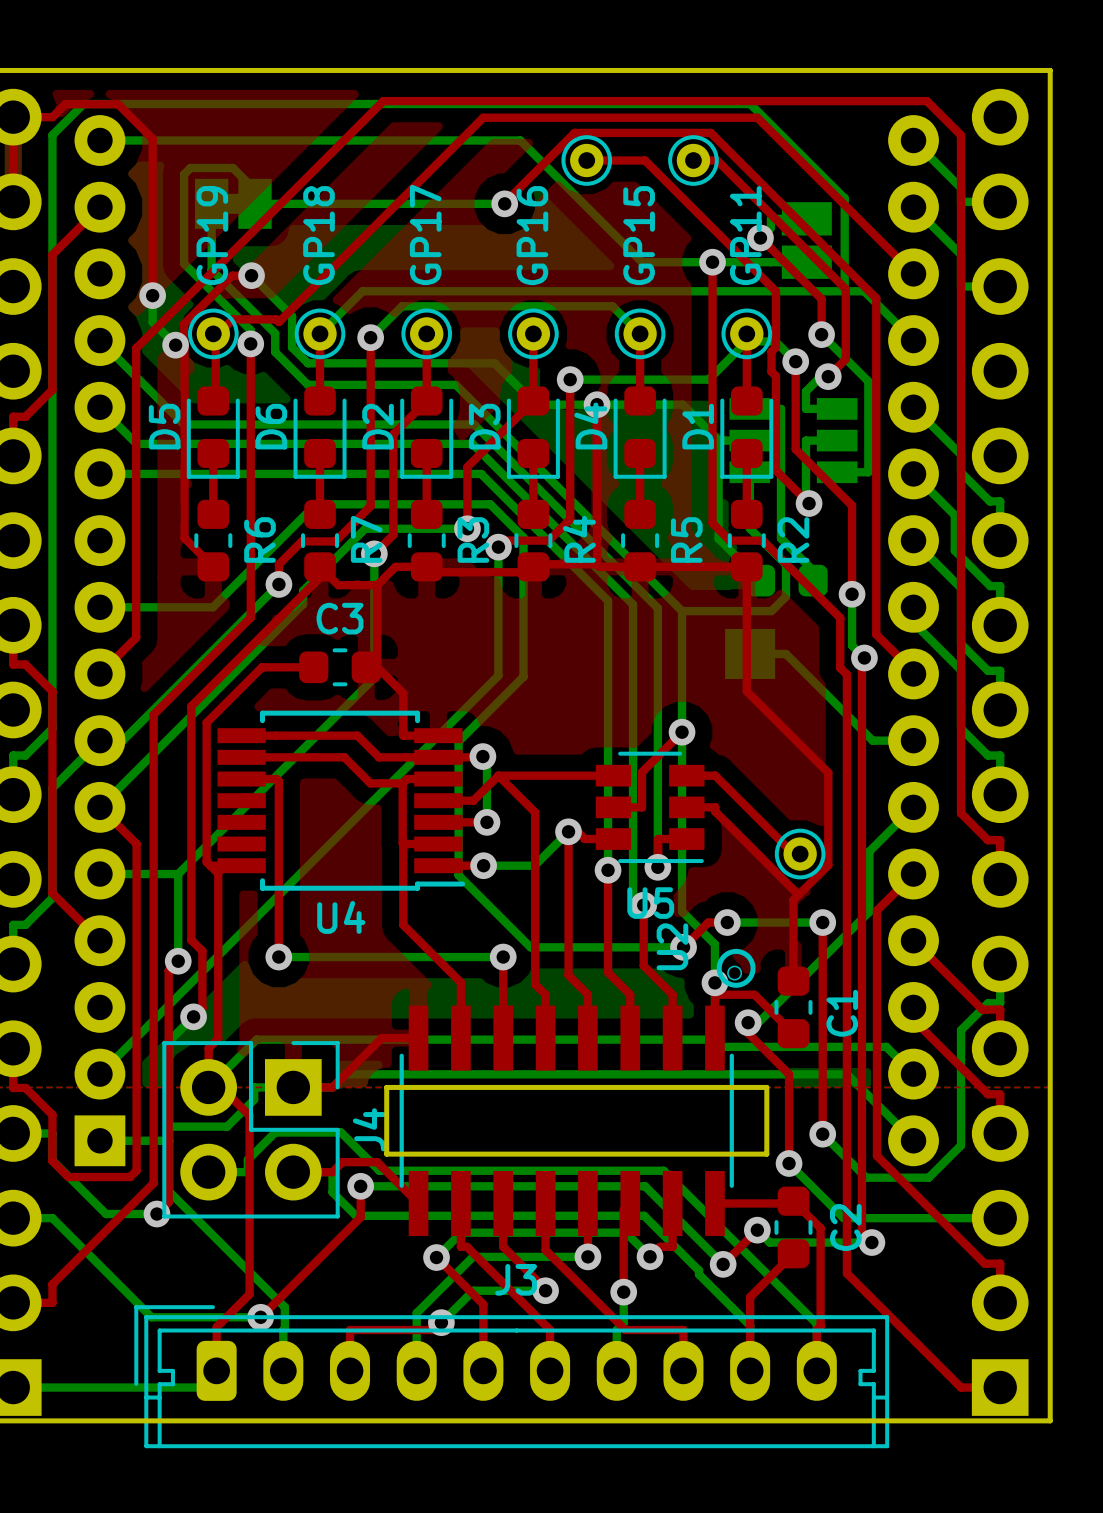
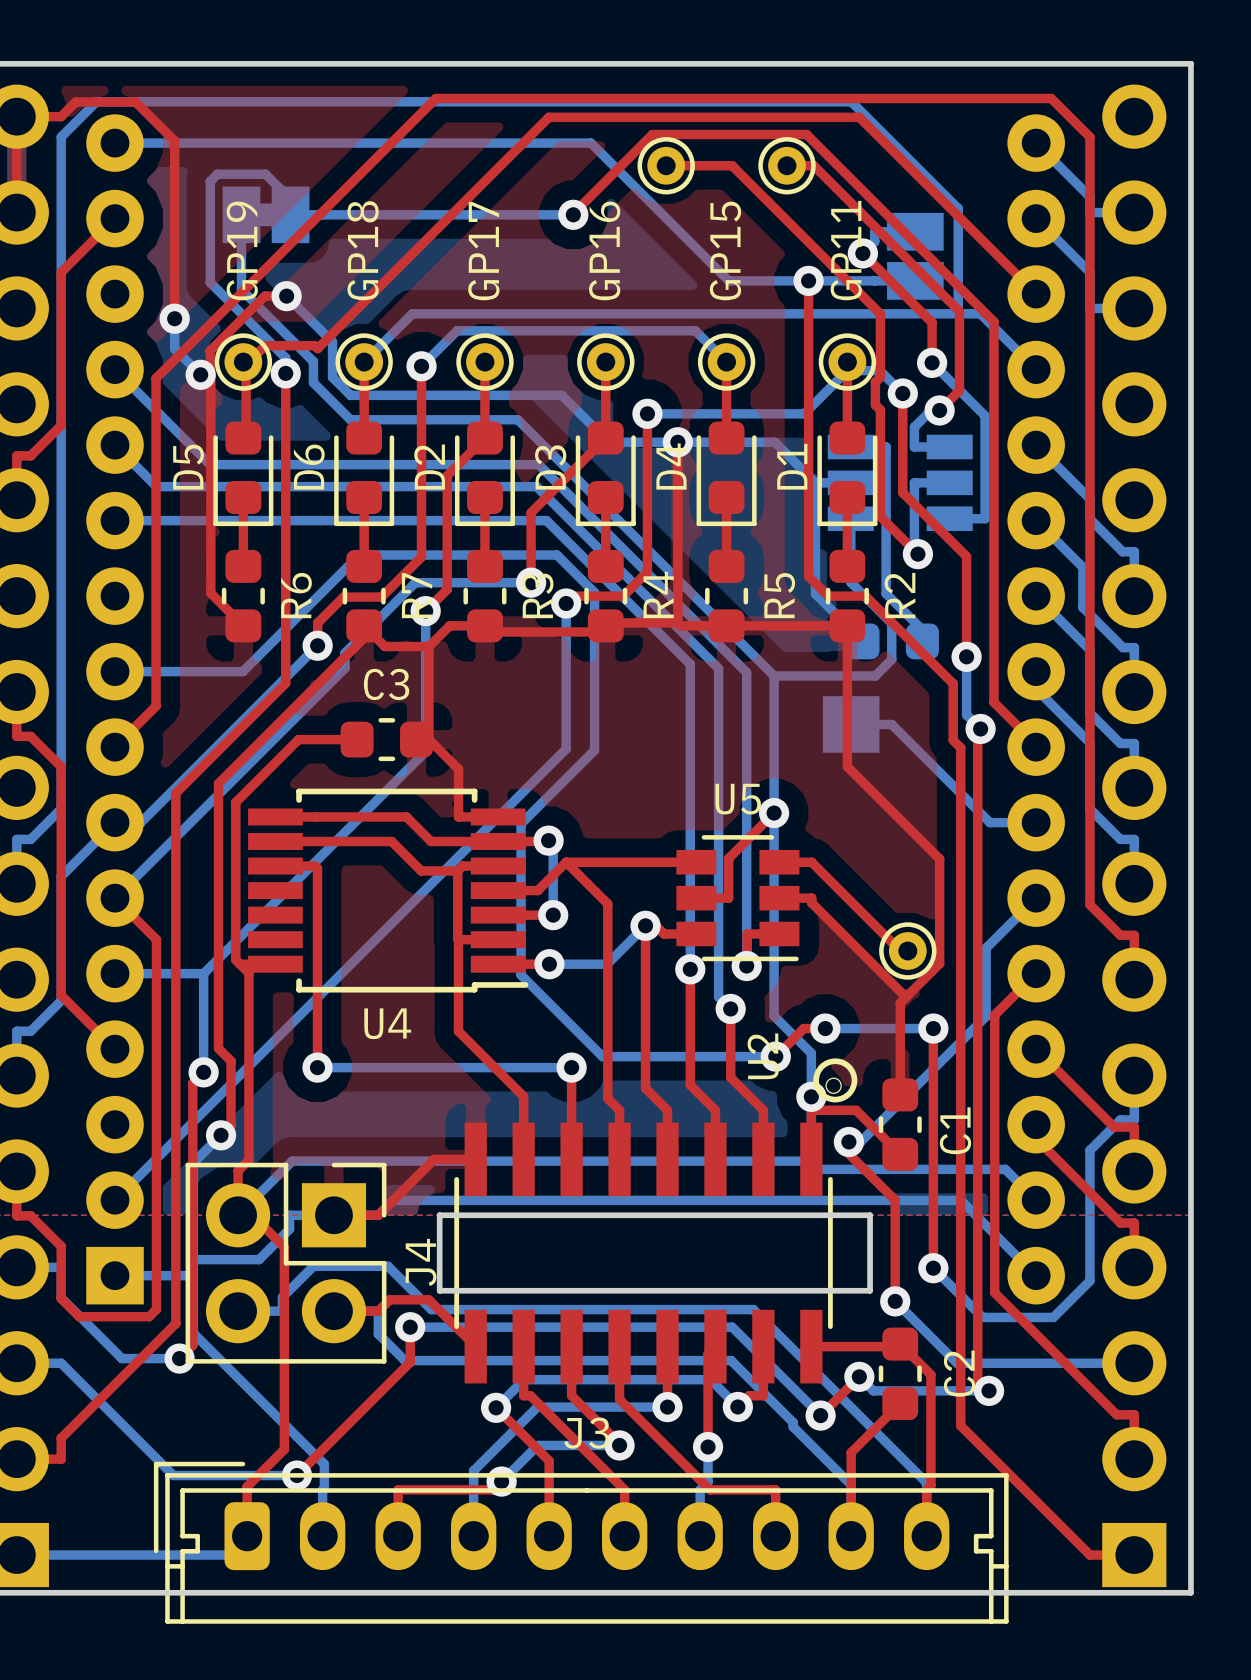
U5 name position: U5 (650, 903) -> U5 (738, 799)

